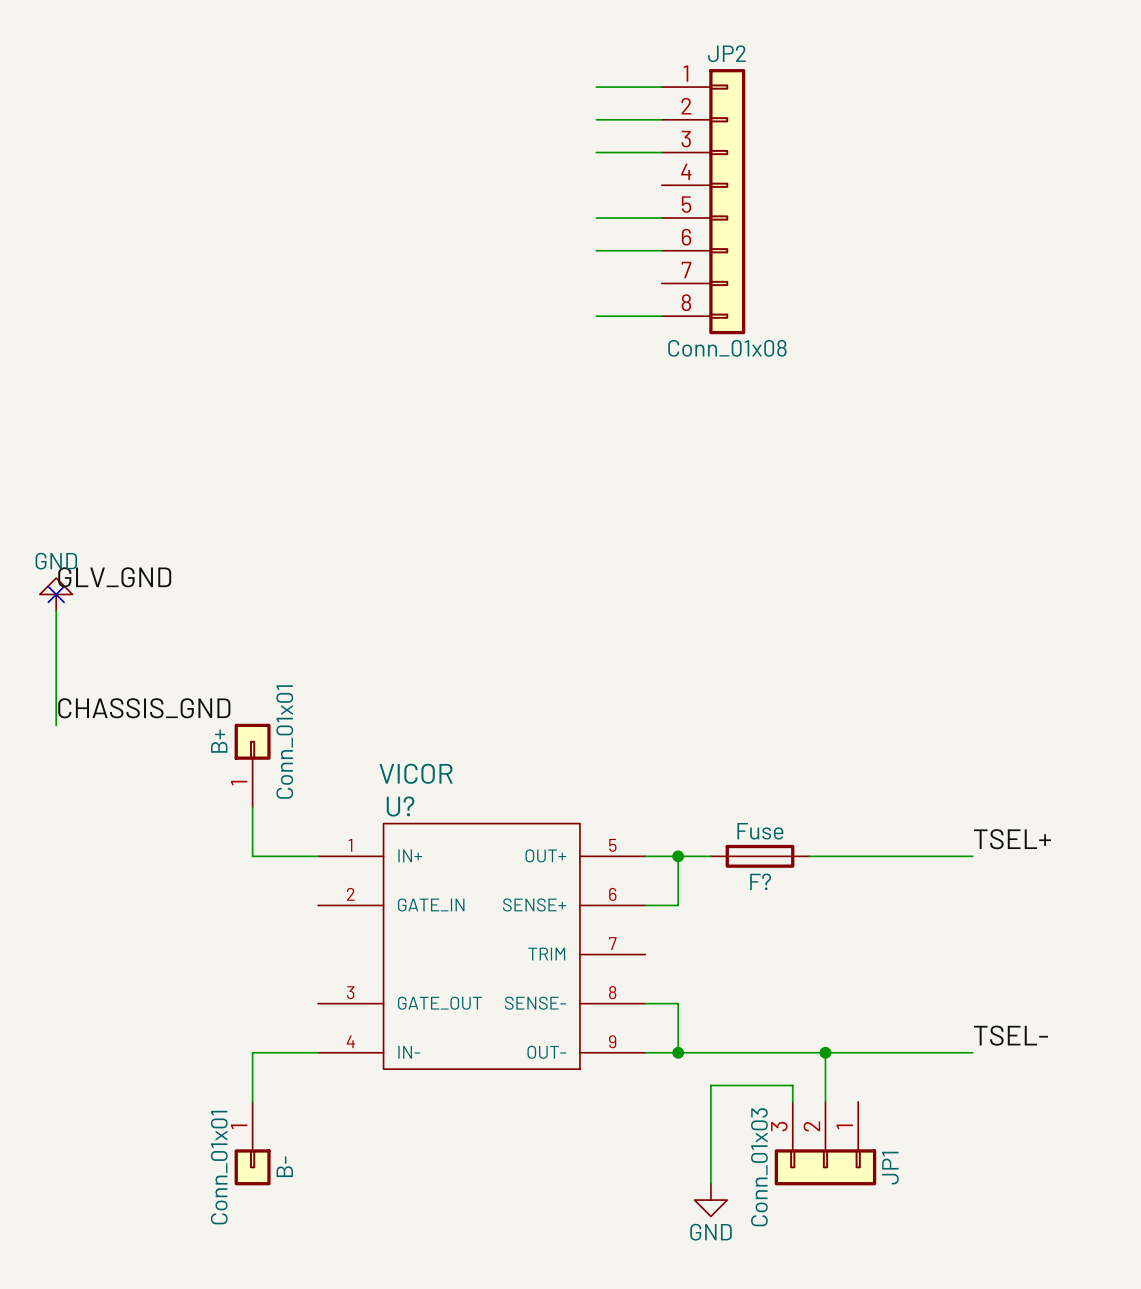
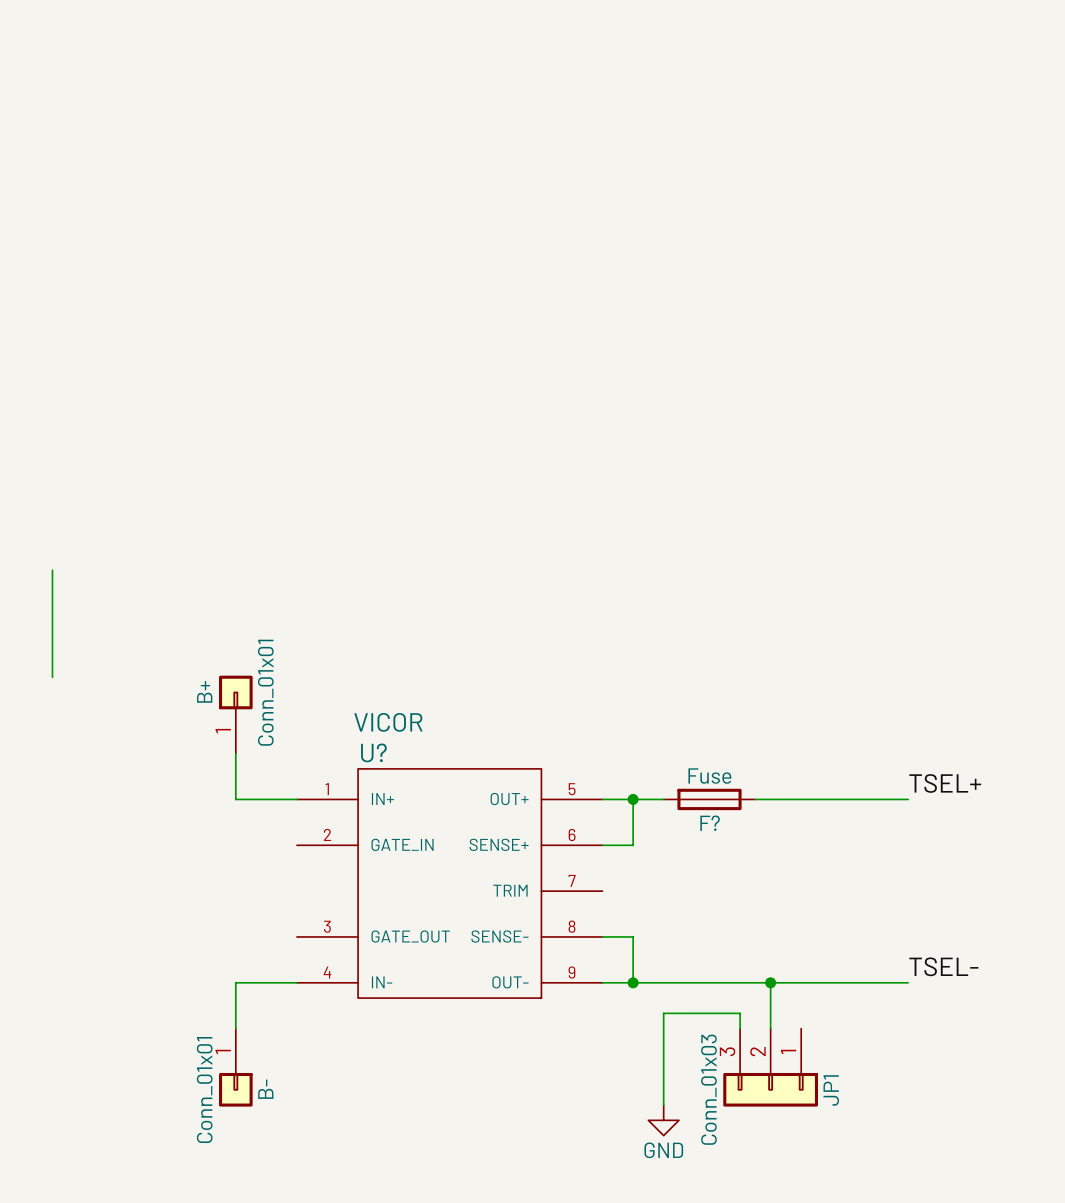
wire: (596, 87) (661, 87) -> none
wire: (596, 119) (661, 119) -> none
wire: (596, 152) (661, 152) -> none
JP2: Conn_01x08 (703, 201) -> none
wire: (596, 218) (661, 218) -> none
wire: (596, 250) (661, 250) -> none
wire: (596, 316) (661, 316) -> none
label: GLV_GND (114, 577) -> none
power symbol: GND (56, 594) -> none
no-connect mark: (56, 594) -> none
label: CHASSIS_GND (144, 708) -> none

